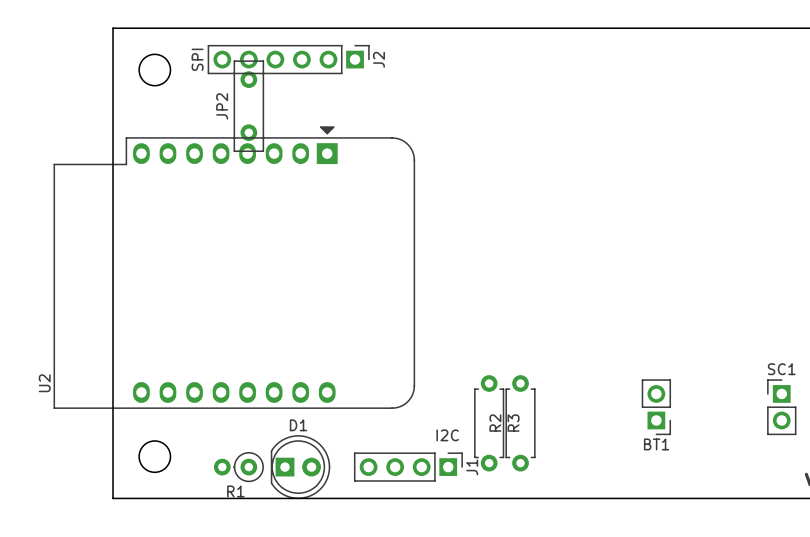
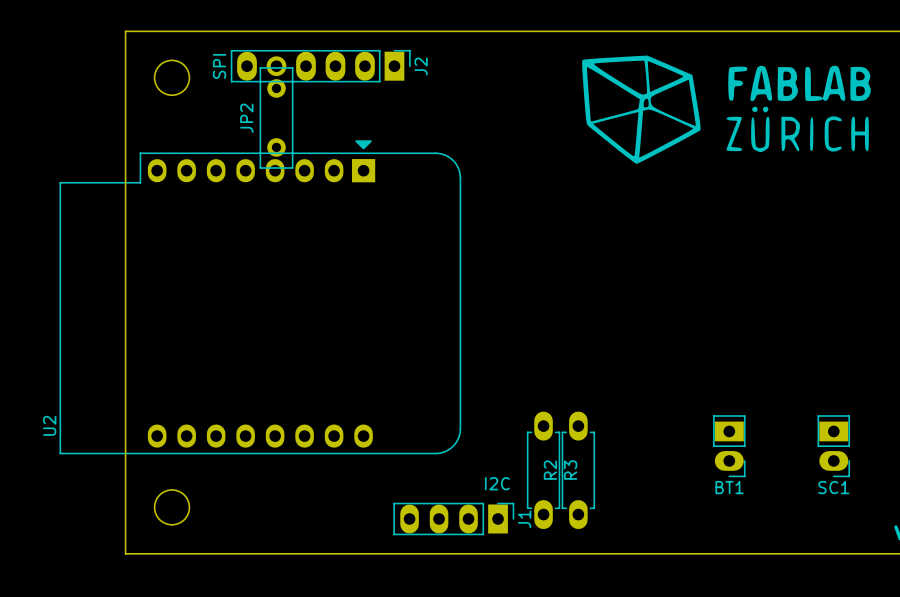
J2 footprint: [207, 45, 370, 75] -> [230, 50, 411, 83]
drawing: none -> [582, 55, 871, 164]
SC1 name position: SC1 (781, 369) -> SC1 (833, 487)
R3 footprint: [474, 375, 505, 472] -> [526, 411, 561, 530]
R2 footprint: [505, 375, 536, 472] -> [561, 411, 595, 530]
BT1 footprint: [641, 379, 671, 436] -> [713, 415, 746, 478]
SC1 footprint: [767, 379, 797, 436] -> [817, 415, 850, 478]
J1 footprint: [354, 452, 463, 482] -> [393, 502, 515, 536]
R1: (238, 467) -> none
D1: (300, 467) -> none

